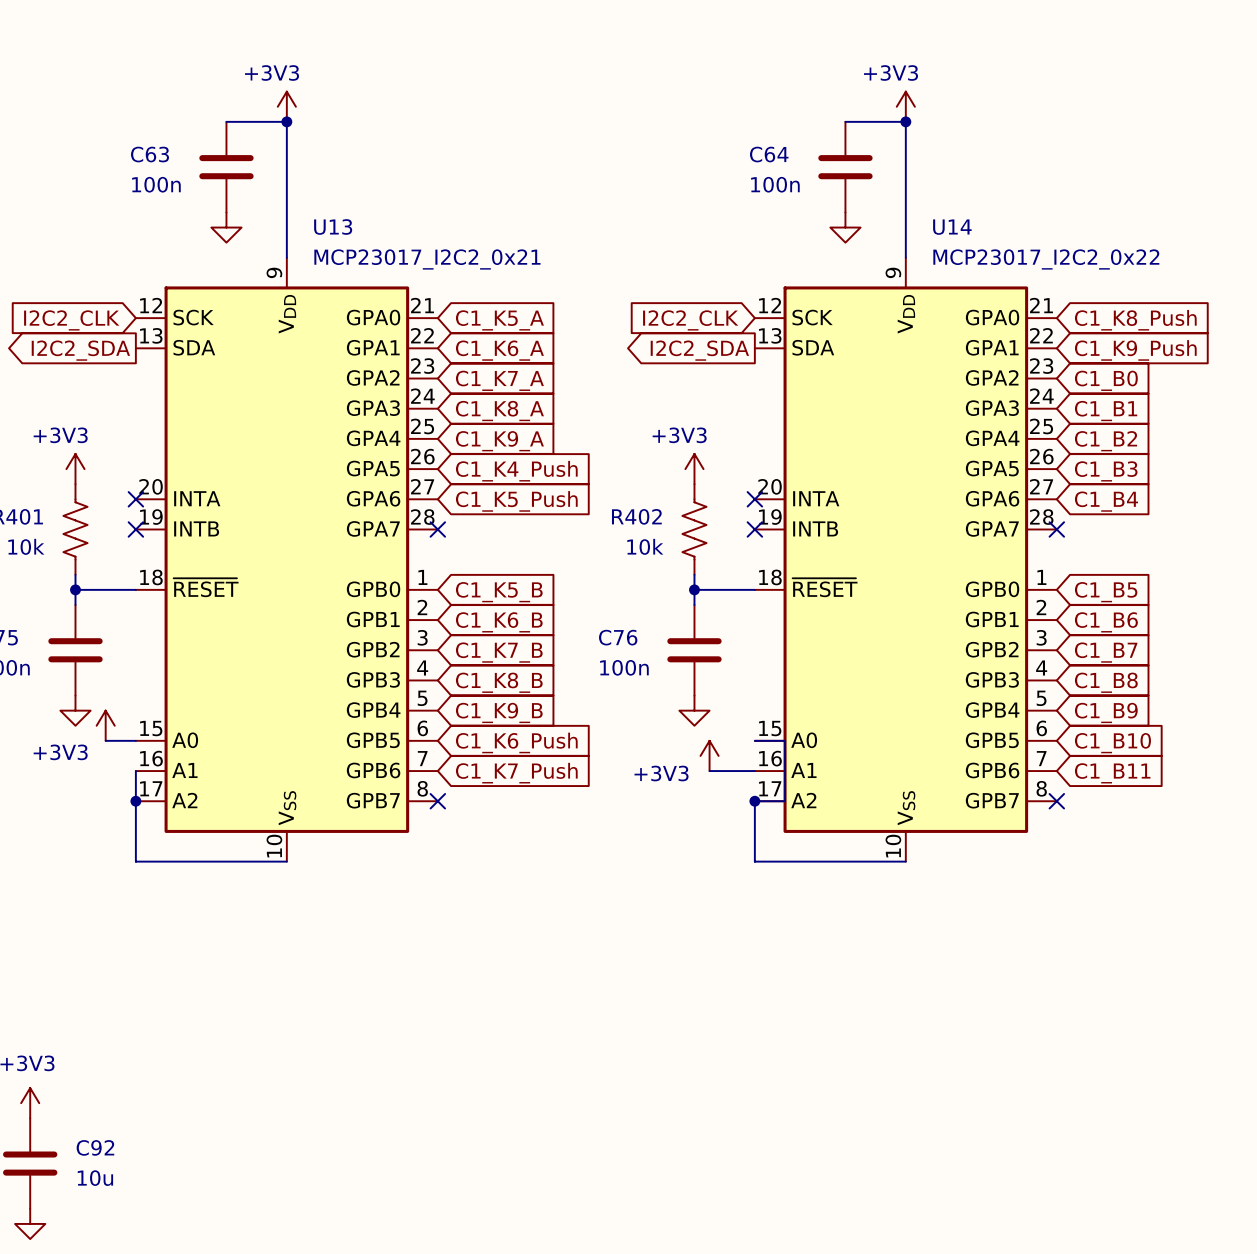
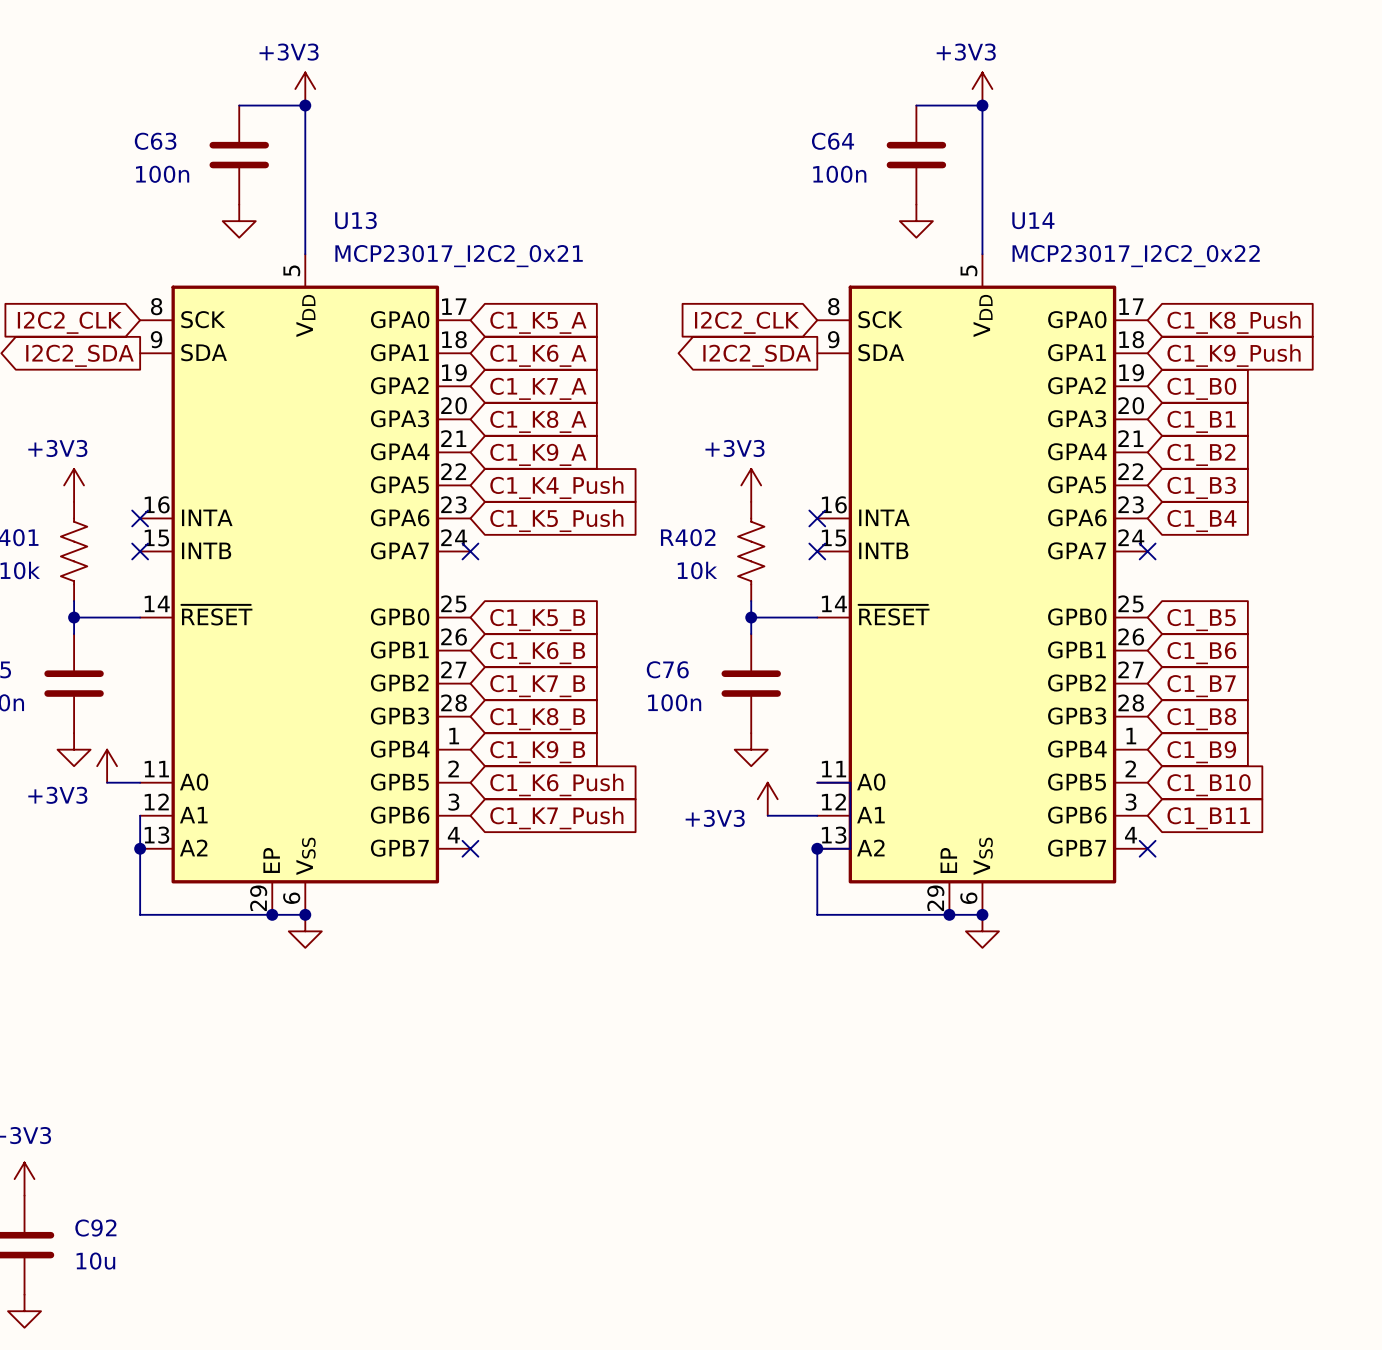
U13 symbol: [135, 257, 438, 862] -> [140, 254, 471, 915]
U14 symbol: [754, 257, 1057, 862] -> [817, 254, 1148, 915]
junction: none -> (272, 914)
junction: none -> (305, 914)
junction: none -> (949, 914)
junction: none -> (982, 914)
power symbol: none -> (305, 931)
power symbol: none -> (982, 931)

